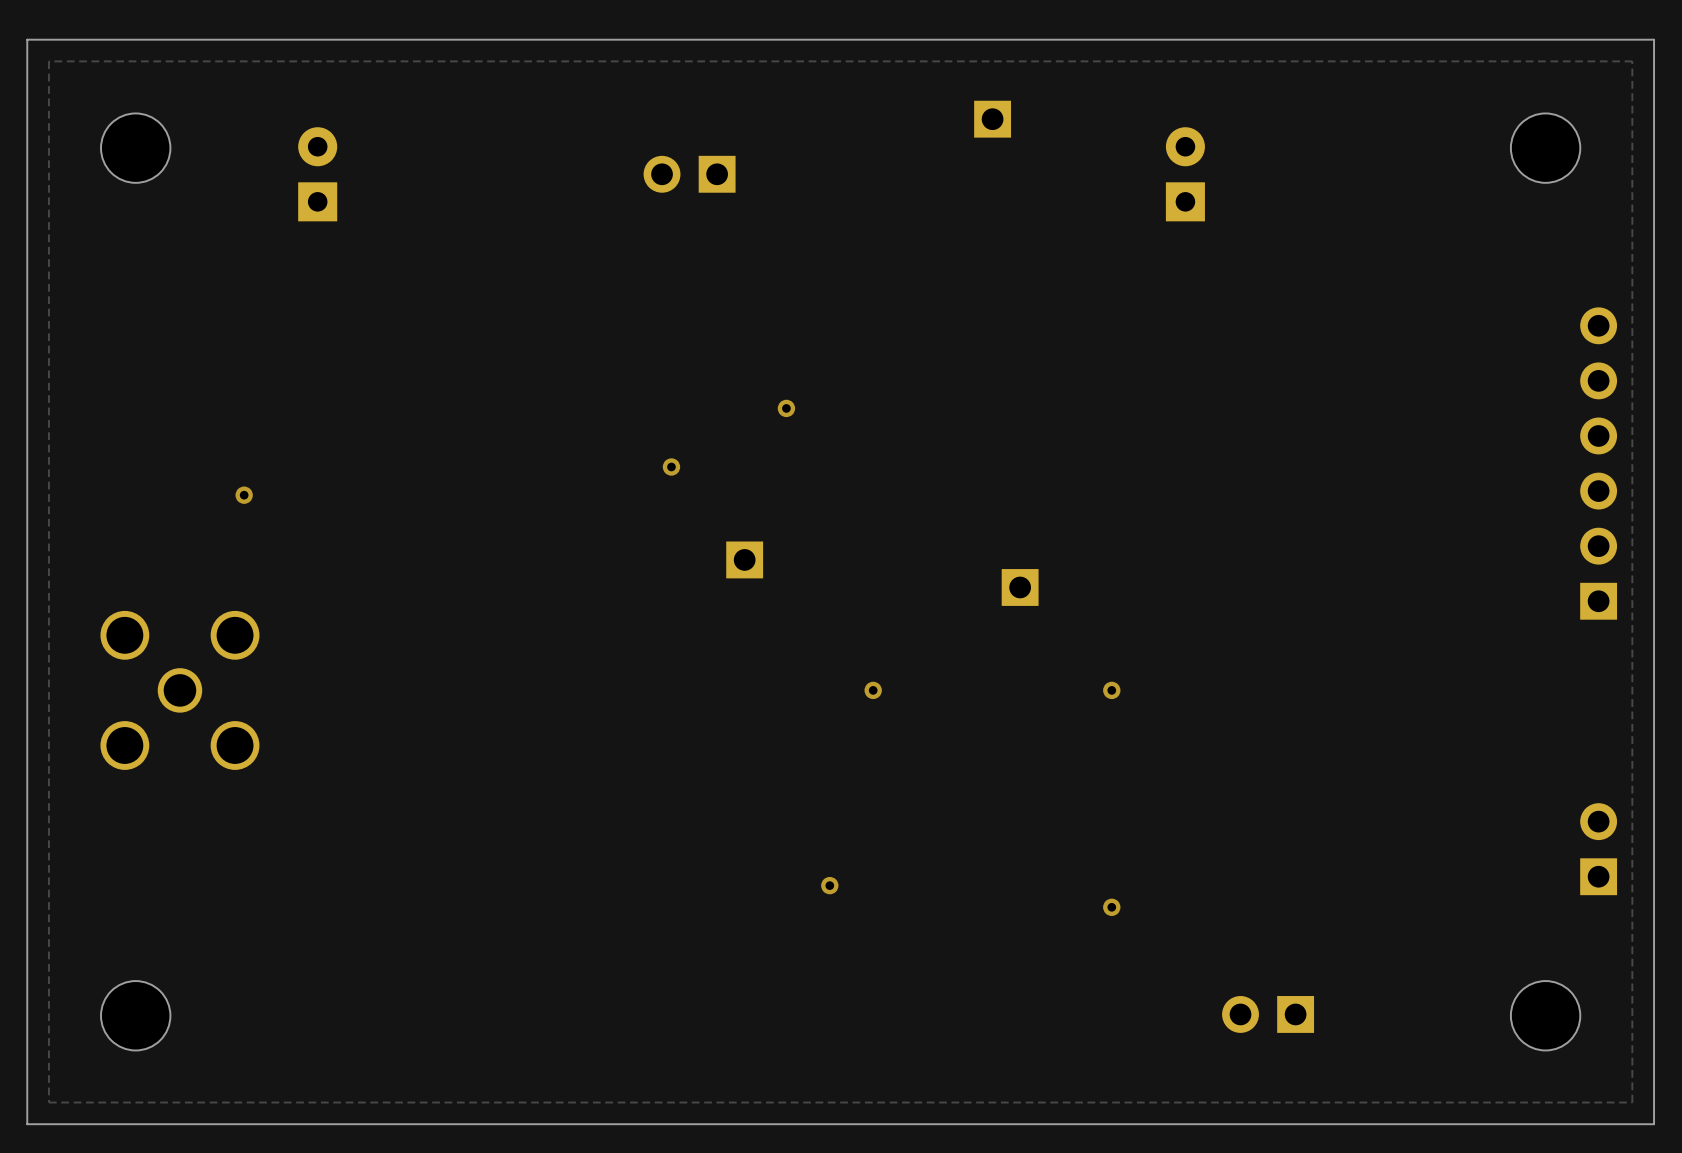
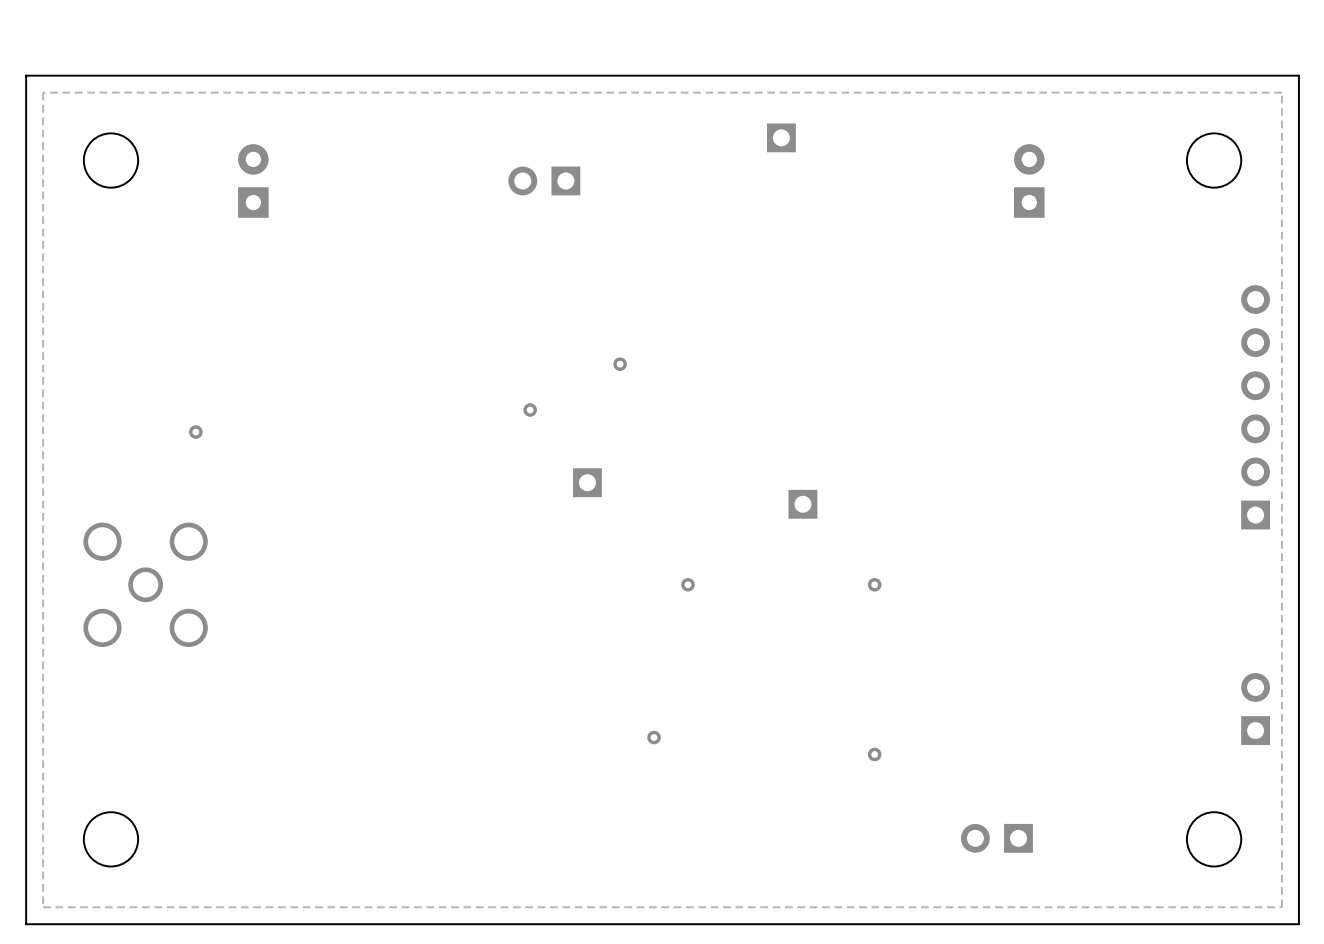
part position: (1185, 174) -> (1029, 180)

